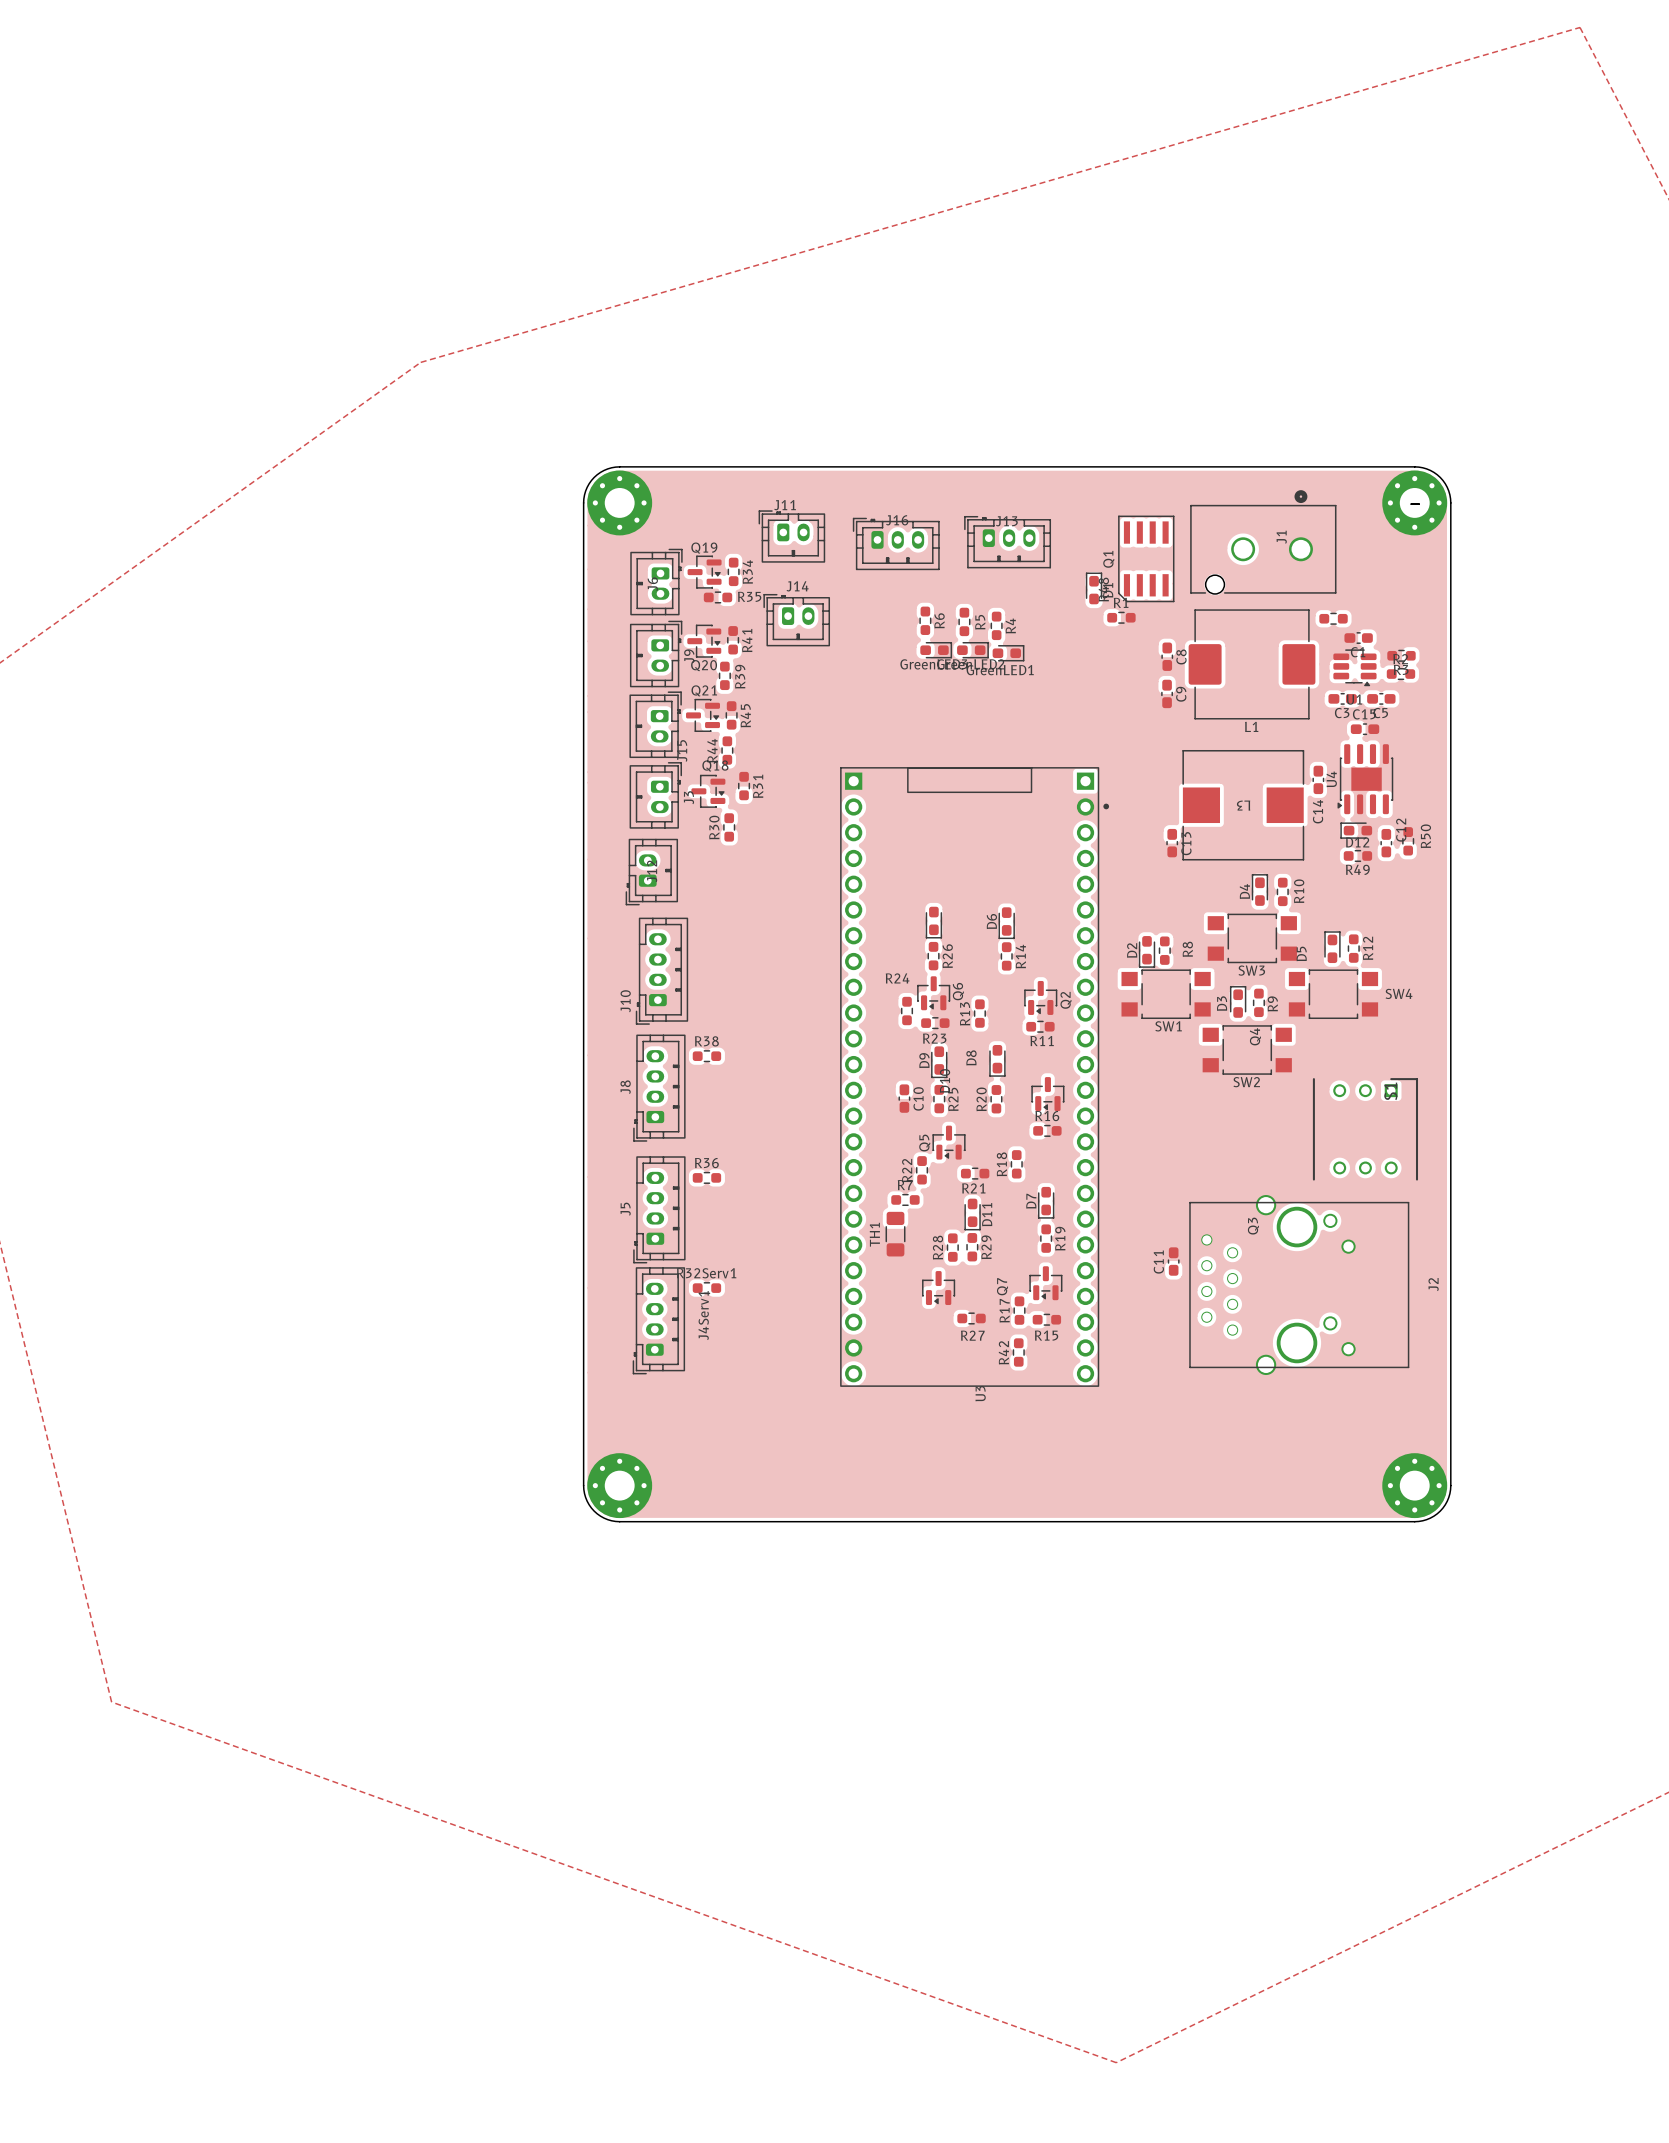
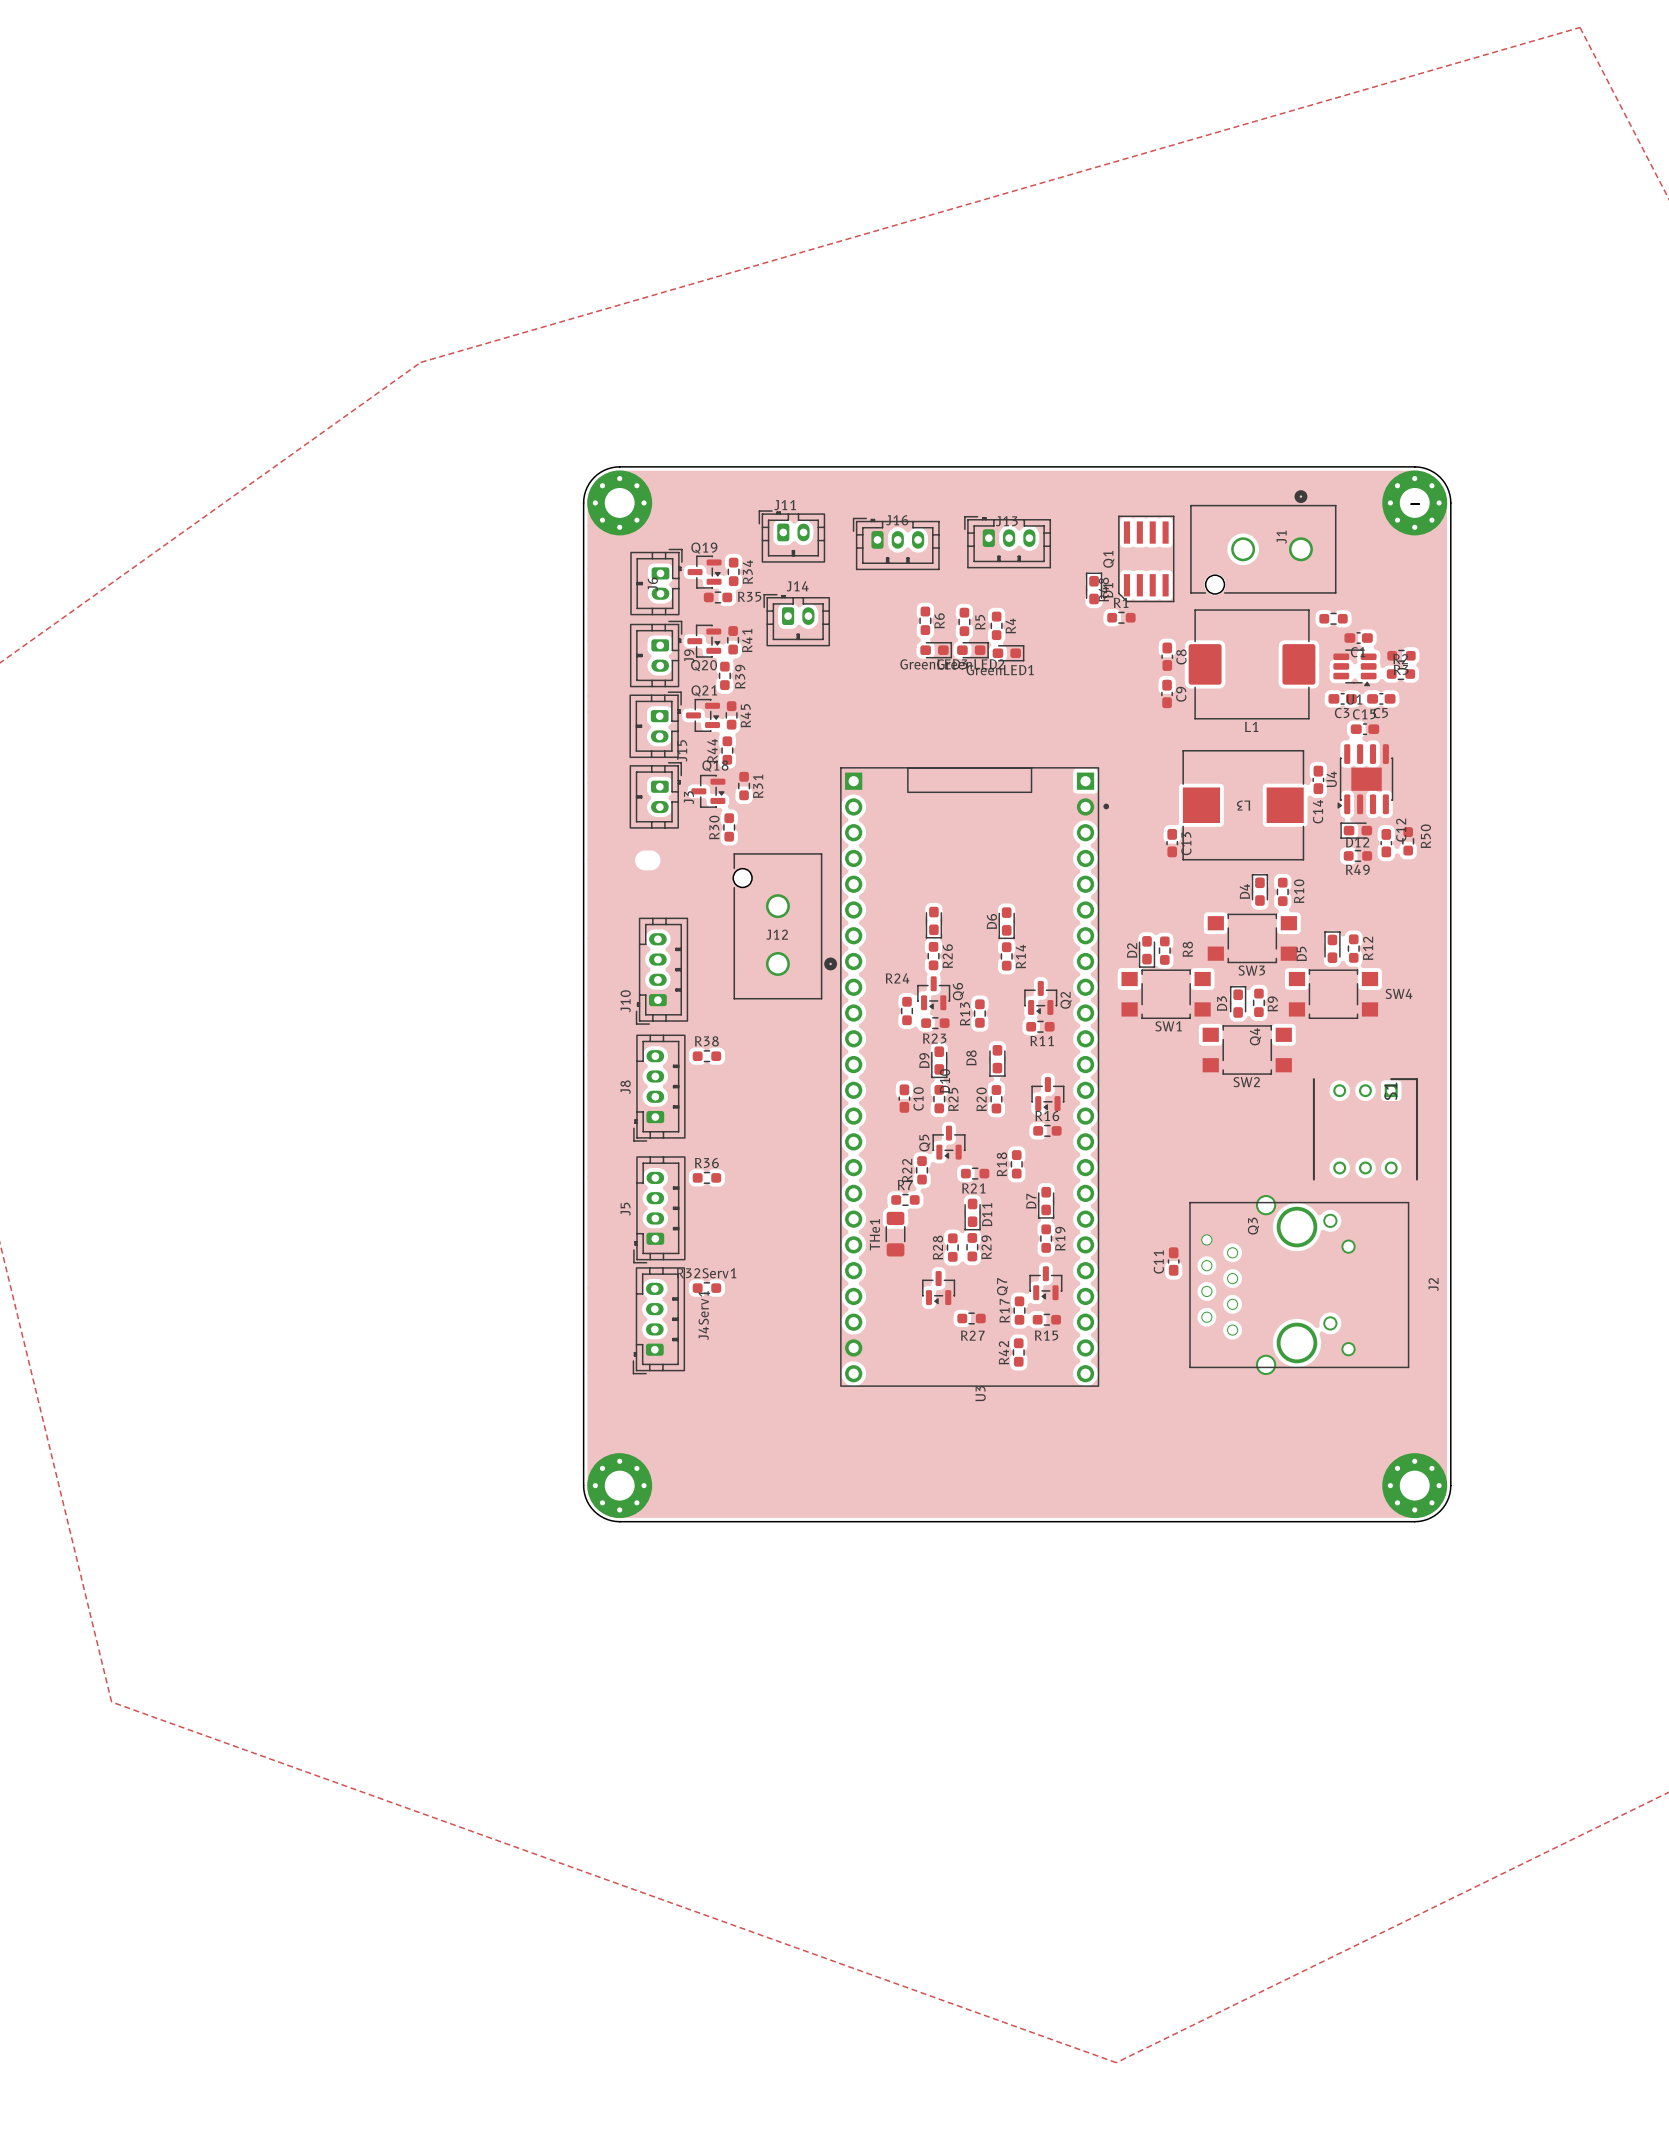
J12 footprint: [625, 838, 678, 906] -> [733, 853, 838, 1000]
TH1 name: TH1 (874, 1234) -> THe1 (874, 1234)

